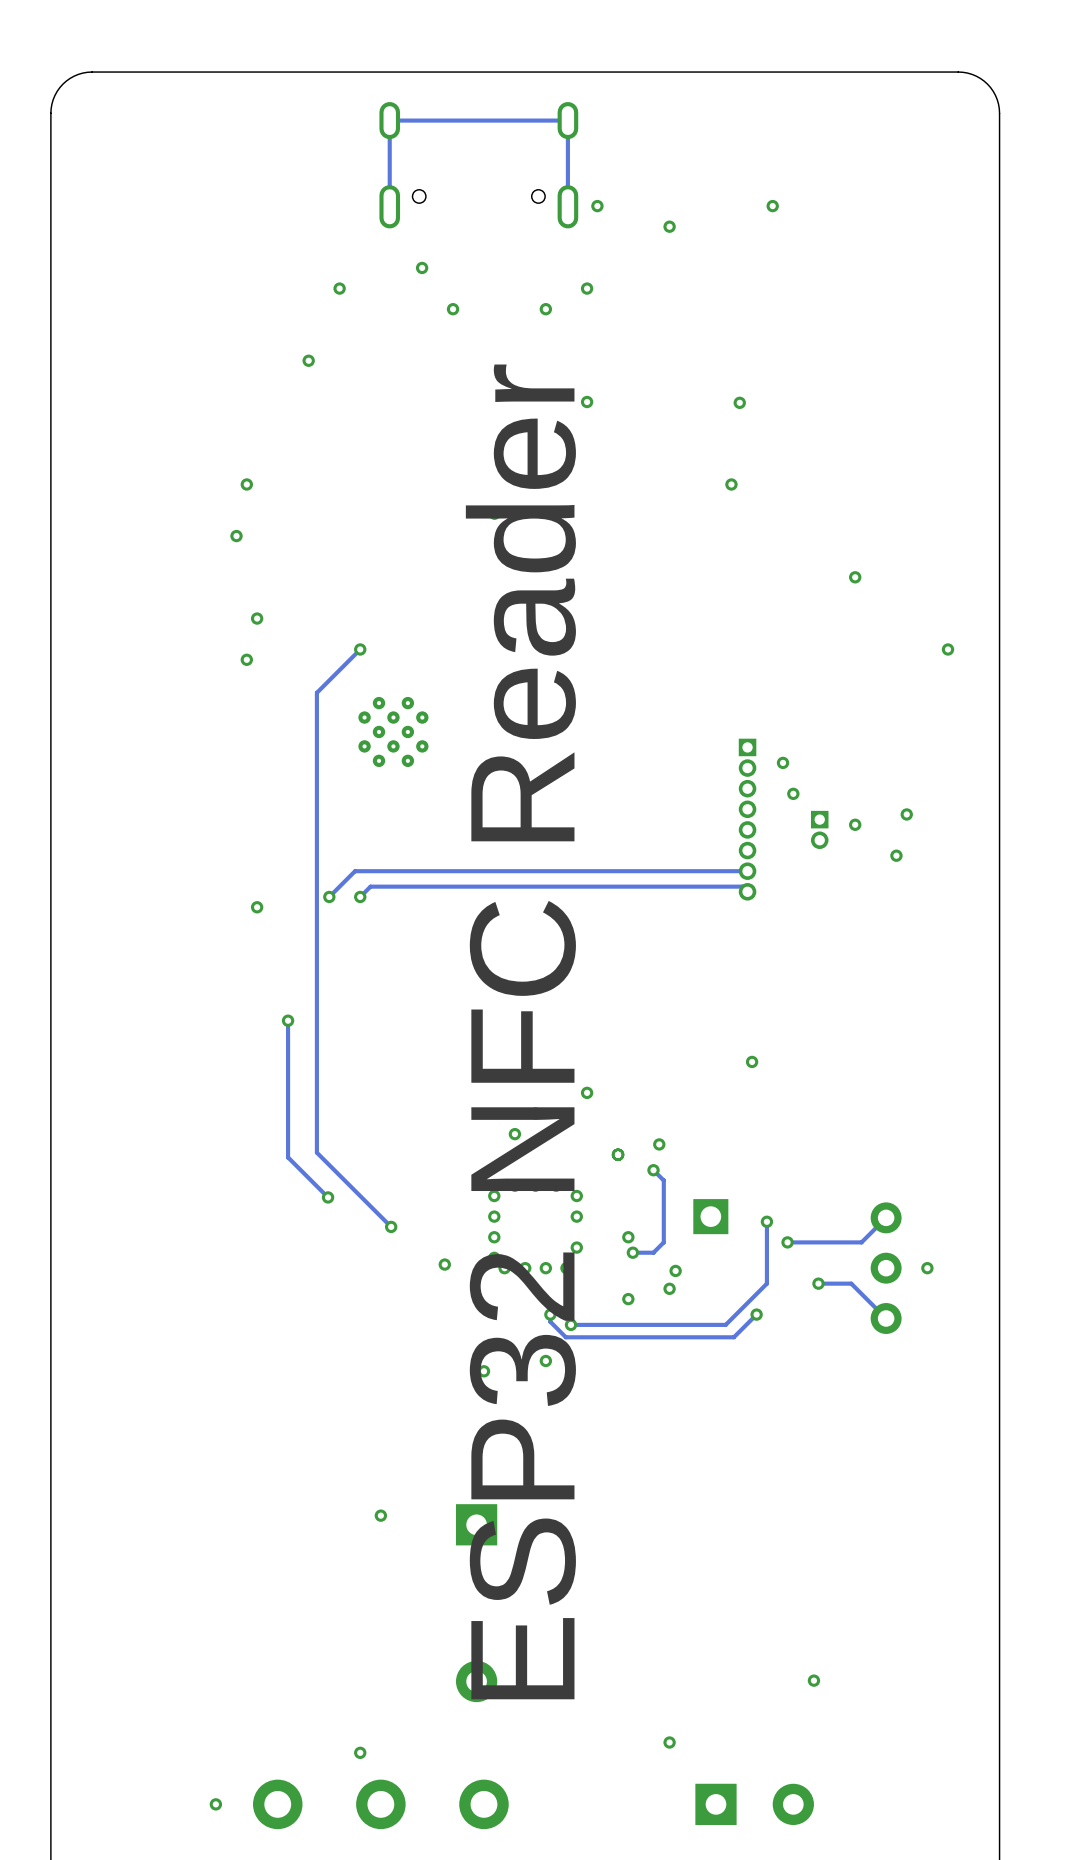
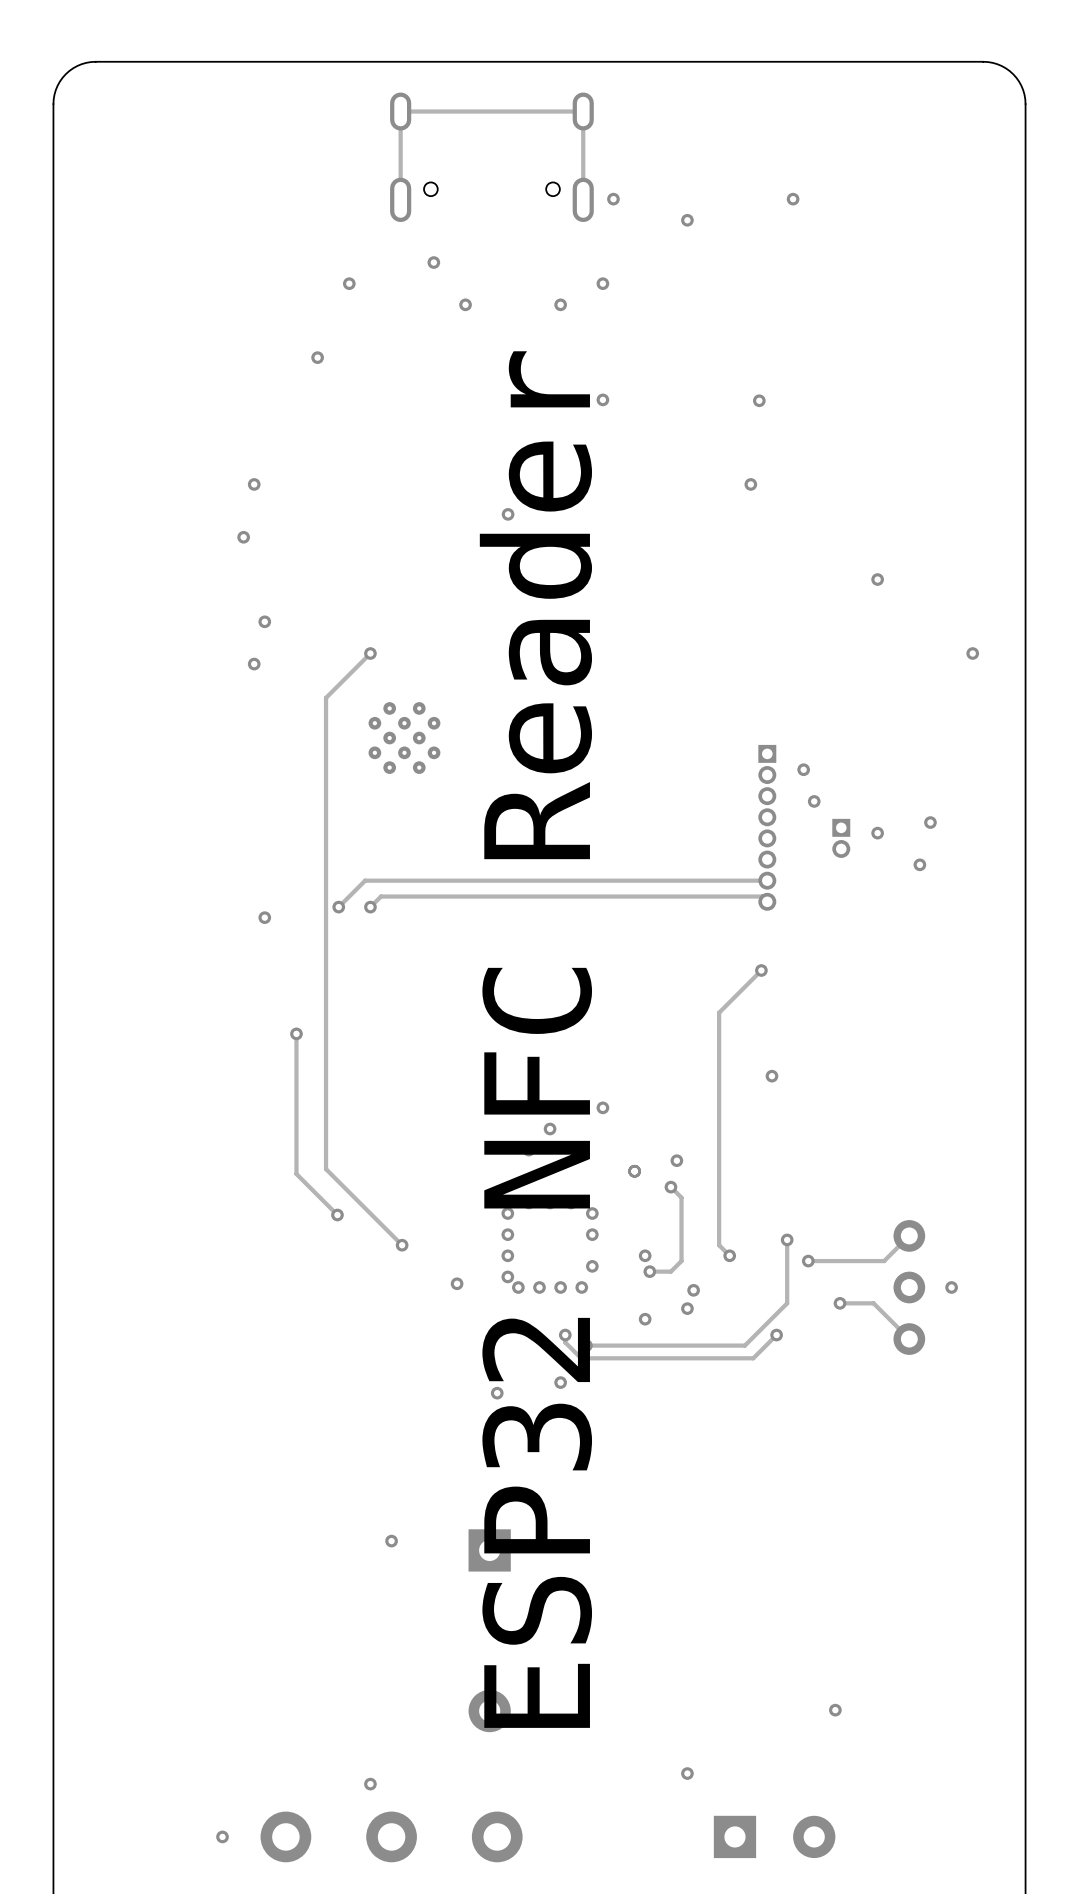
track: none -> (761, 970) (719, 1012) (719, 1245) (729, 1255)
via: none -> (761, 970)
part: (710, 1216) -> none
via: none -> (729, 1255)

